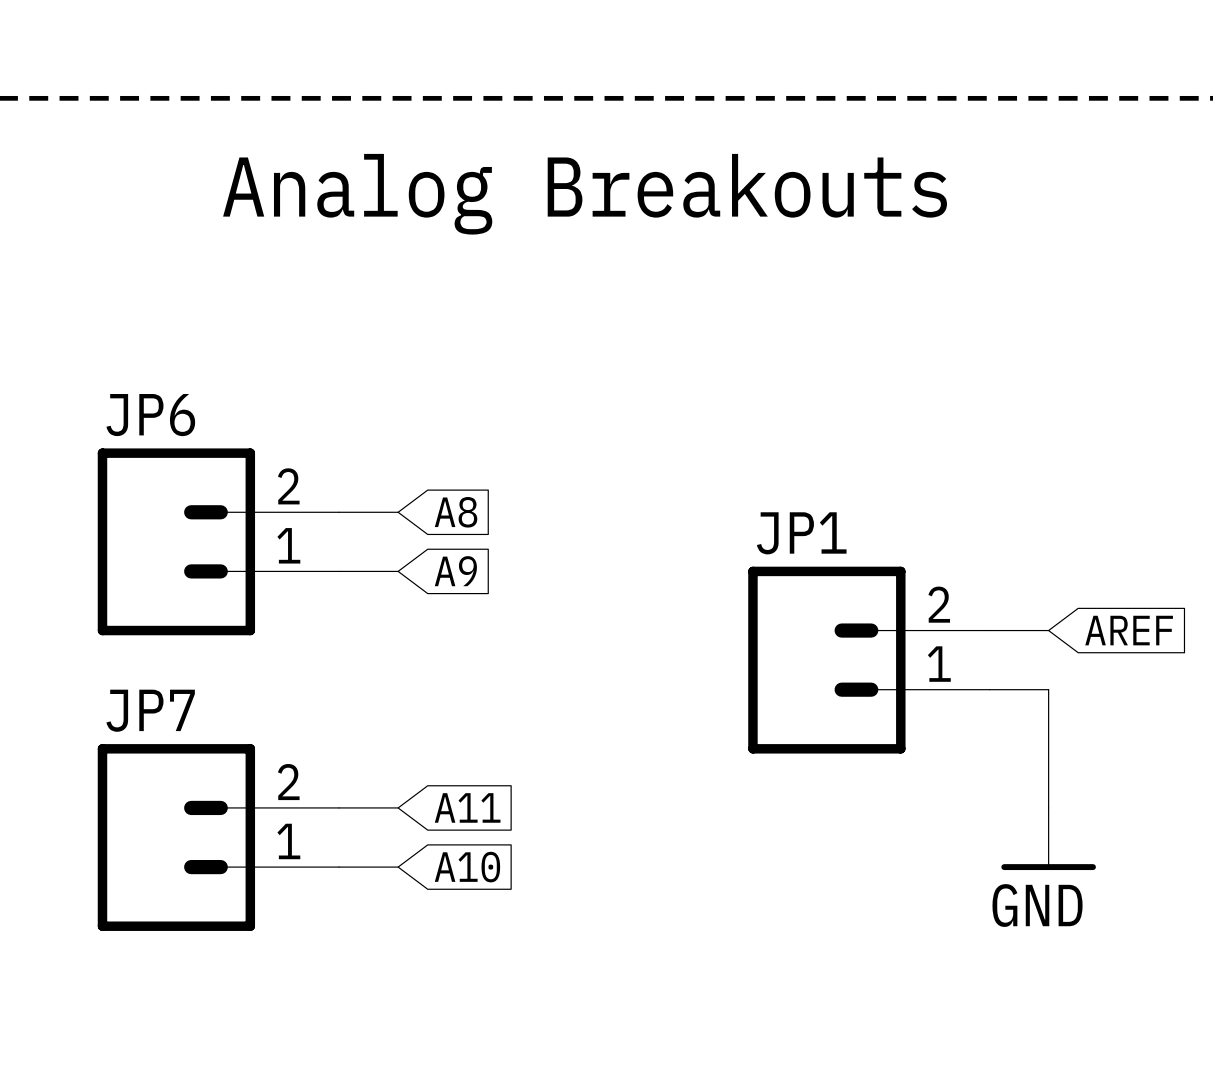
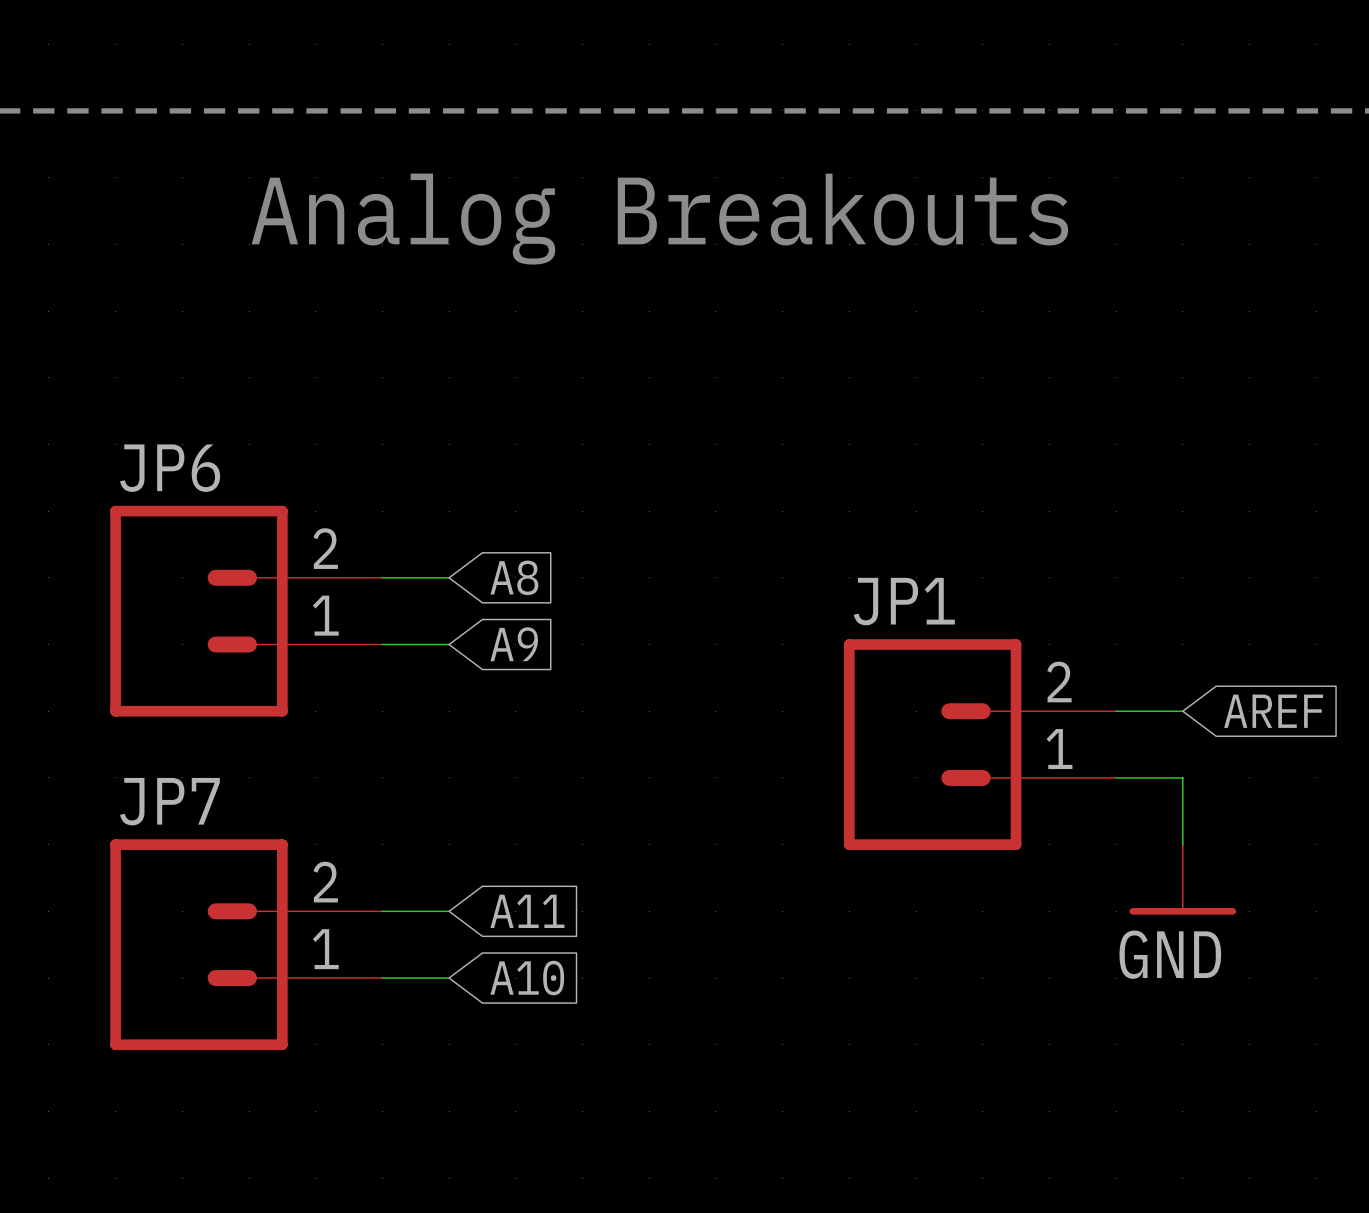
power symbol position: GND (1048, 838) -> GND (1182, 879)

